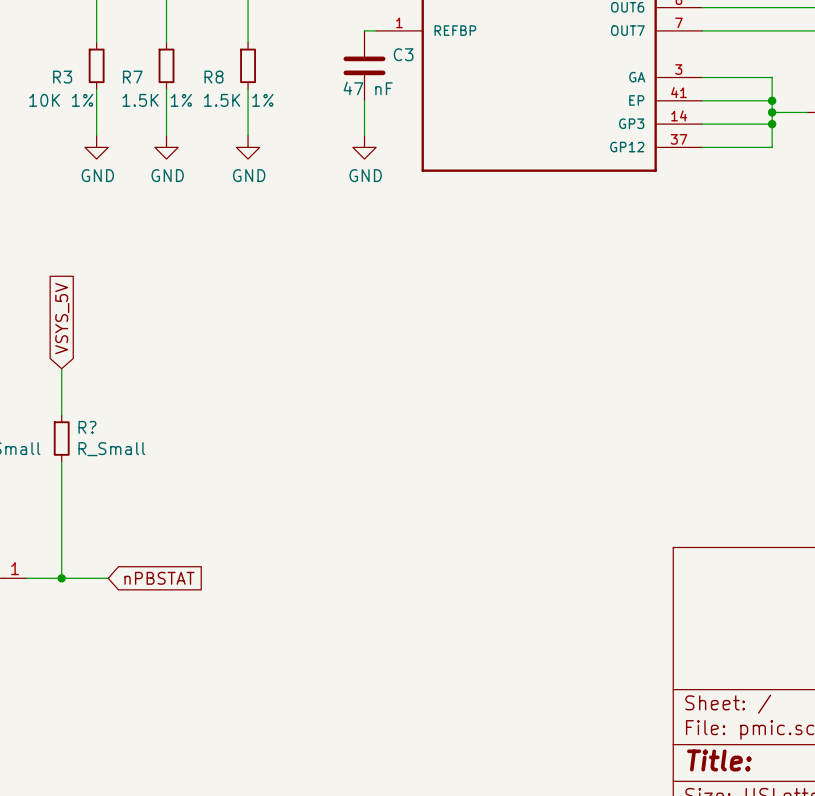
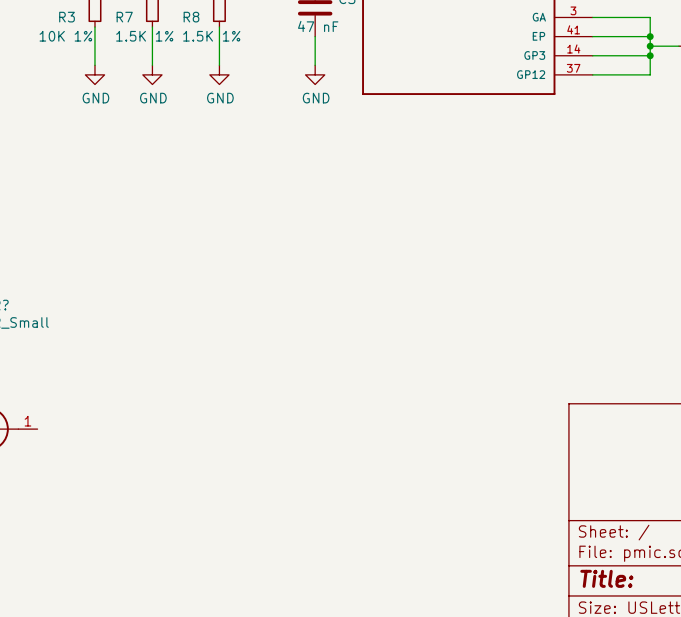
global label: VSYS_5V (62, 318) -> none
wire: (61, 368) (61, 415) -> none
R?: R_Small (61, 438) -> none
wire: (61, 461) (61, 578) -> none
wire: (26, 578) (108, 578) -> none
junction: (61, 578) -> none
global label: nPBSTAT (159, 578) -> none

